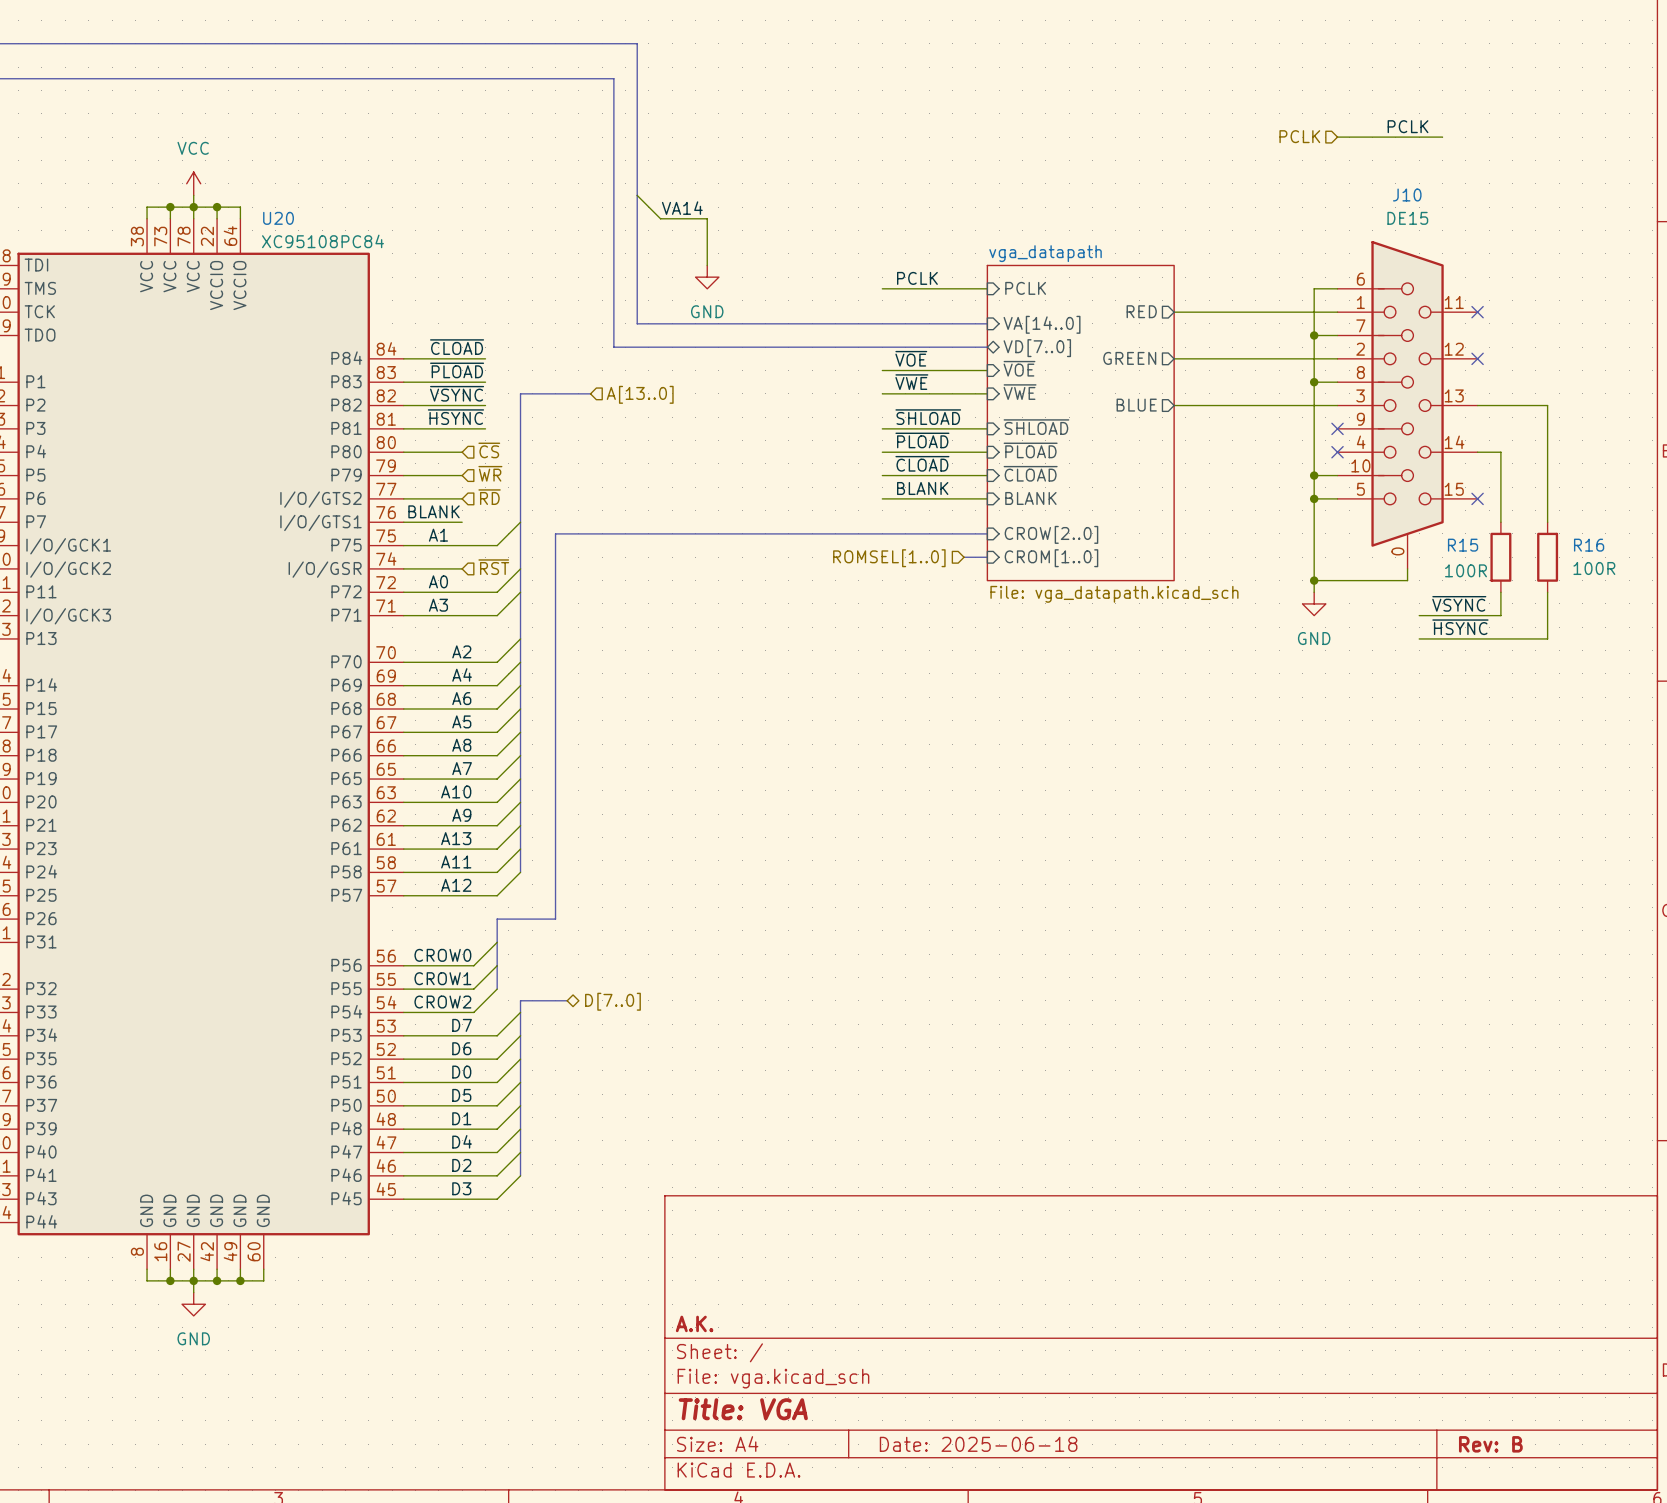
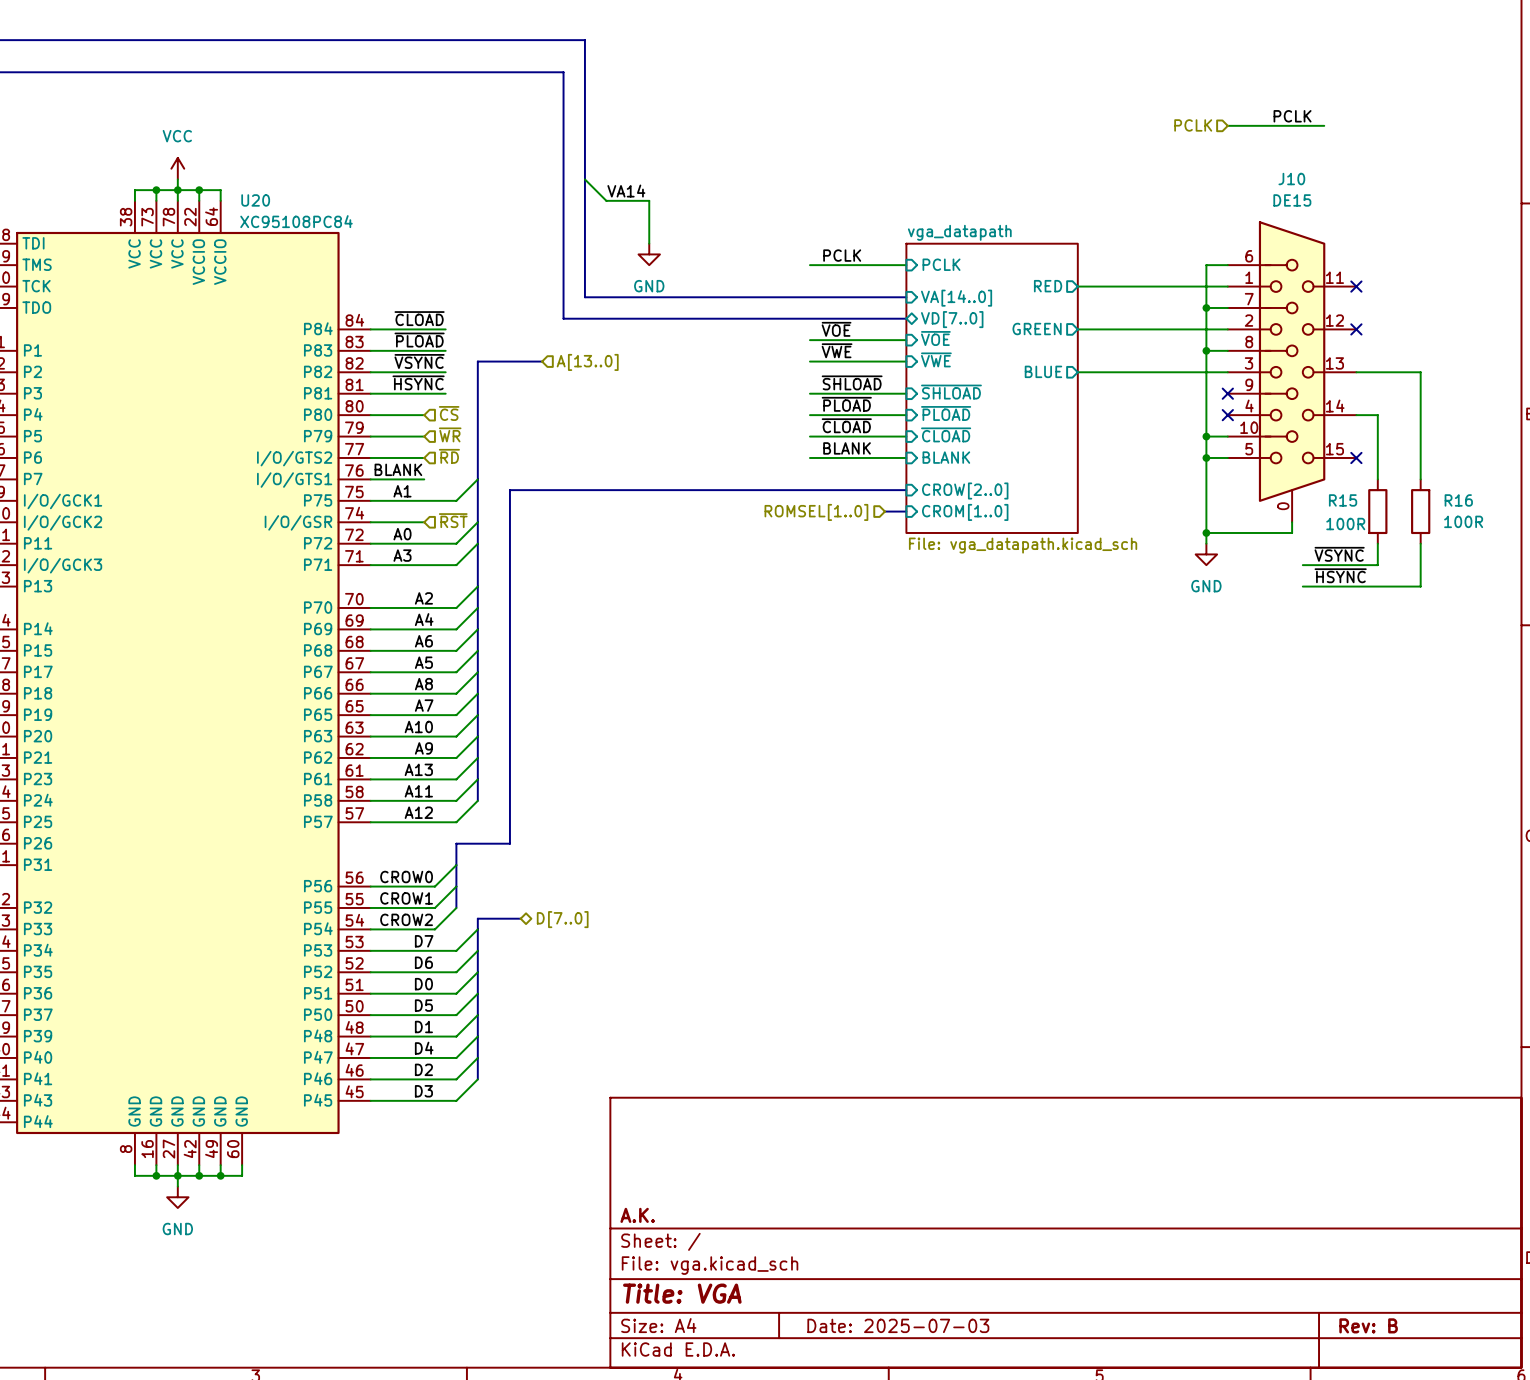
title block: Date: 2025-06-18 (978, 1444) -> Date: 2025-07-03 (898, 1325)

